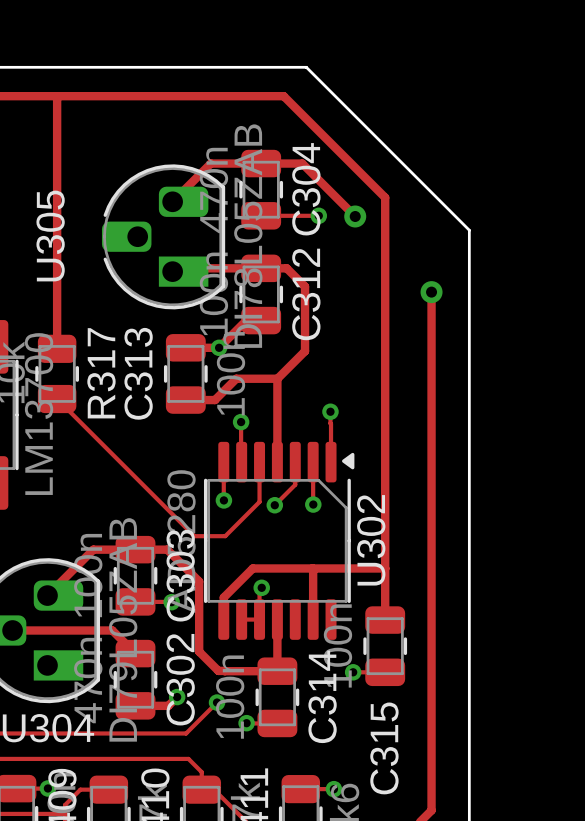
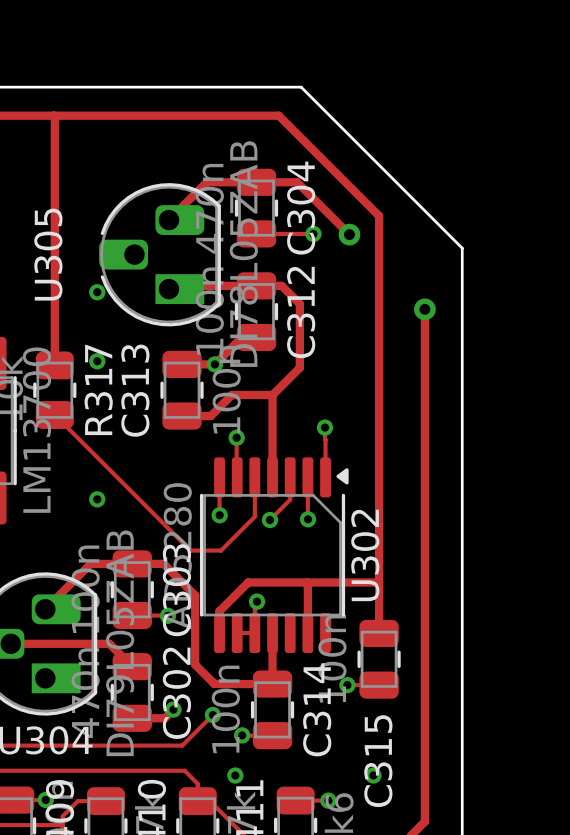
via: none -> (97, 292)
via: none -> (97, 361)
via: none -> (97, 499)
via: none -> (235, 775)
via: none -> (373, 775)

